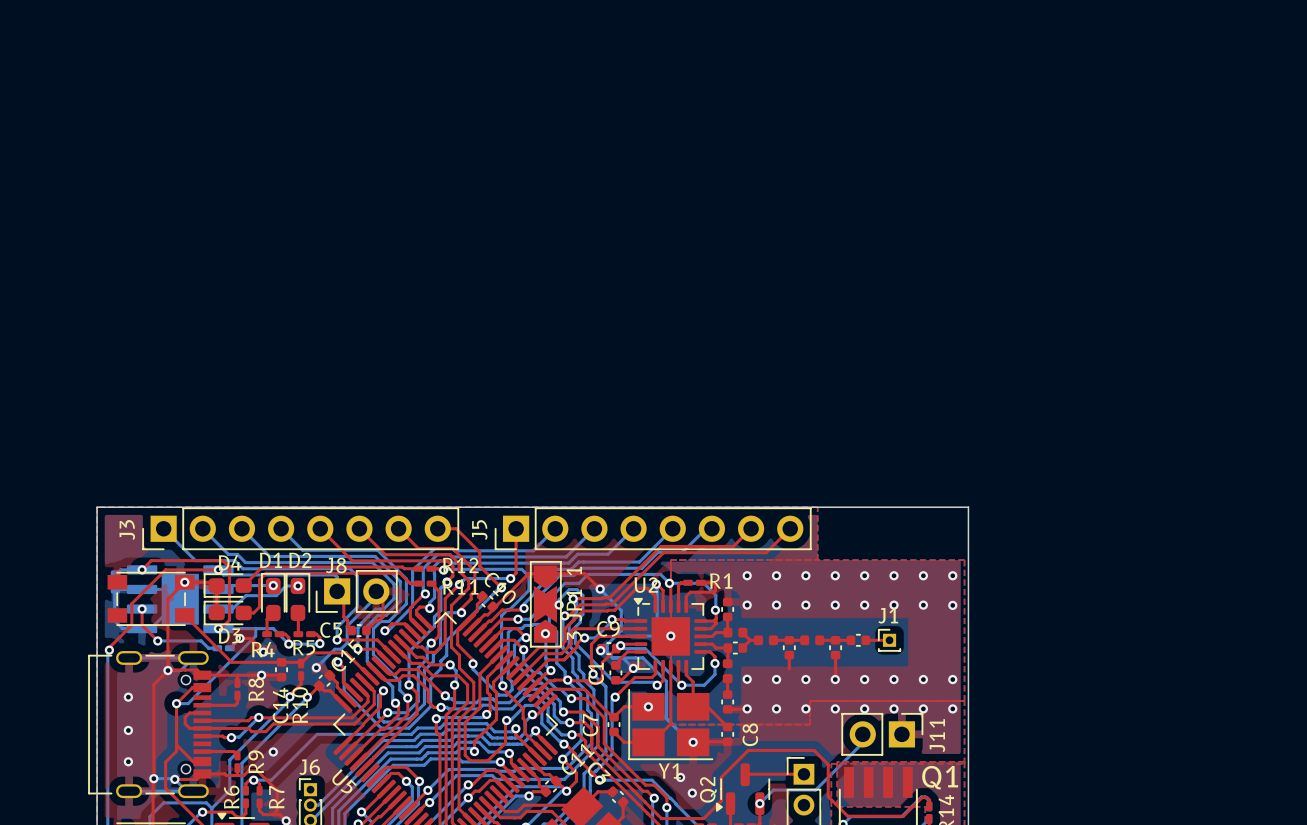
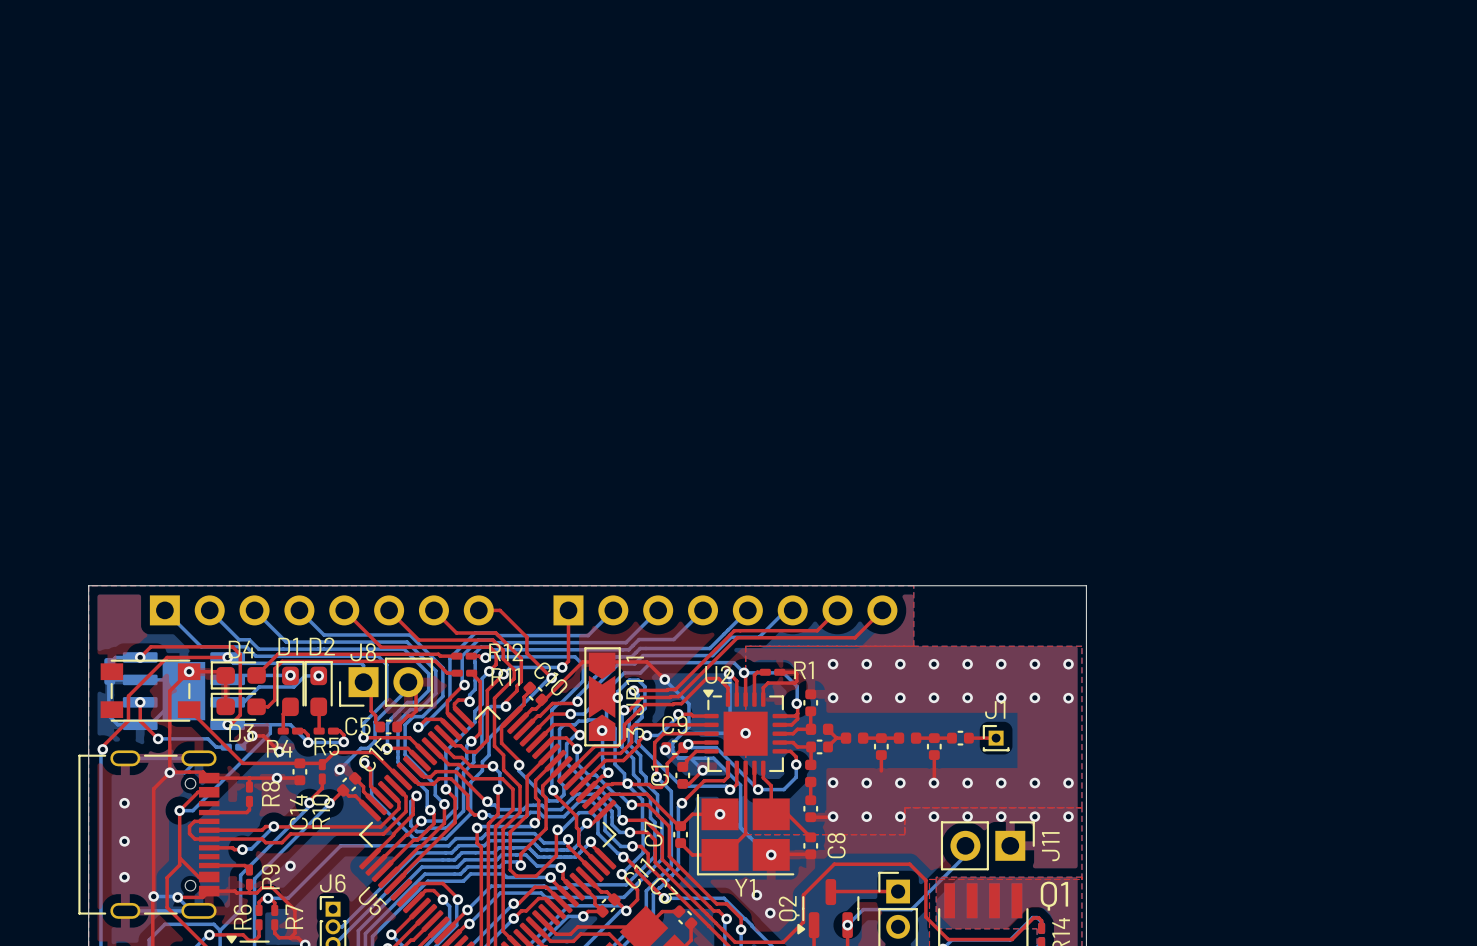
J3: (300, 528) -> none
J5: (653, 528) -> none

